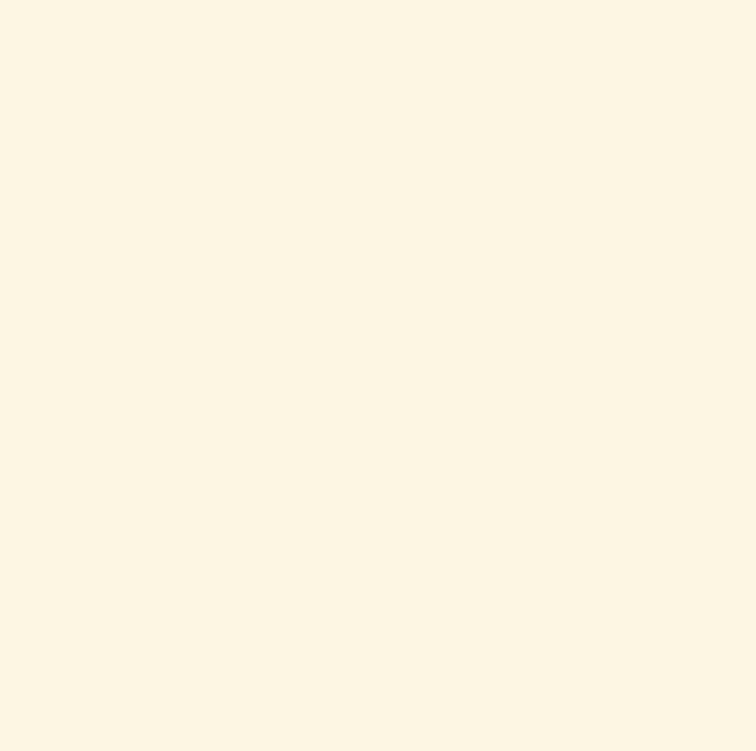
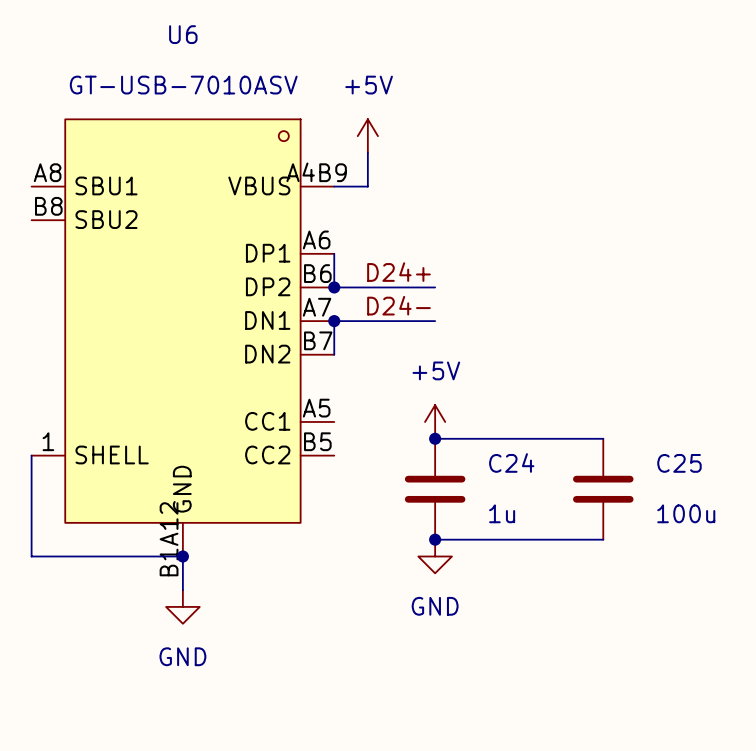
power symbol: none -> +5V (367, 136)
wire: none -> (367, 152) (367, 186) (334, 186)
wire: none -> (334, 253) (334, 287) (435, 287)
label: none -> D24+ (398, 272)
junction: none -> (334, 287)
label: none -> D24- (398, 305)
junction: none -> (334, 321)
wire: none -> (435, 321) (334, 321) (334, 354)
U6: none -> GT-USB-7010ASV (182, 337)
power symbol: none -> +5V (435, 421)
wire: none -> (435, 438) (603, 438)
junction: none -> (435, 438)
wire: none -> (31, 455) (31, 556) (182, 556) (182, 590)
C24: none -> 1u (435, 489)
C25: none -> 100u (603, 489)
wire: none -> (435, 539) (603, 539)
junction: none -> (435, 539)
junction: none -> (182, 556)
power symbol: none -> GND (435, 556)
power symbol: none -> GND (182, 606)

